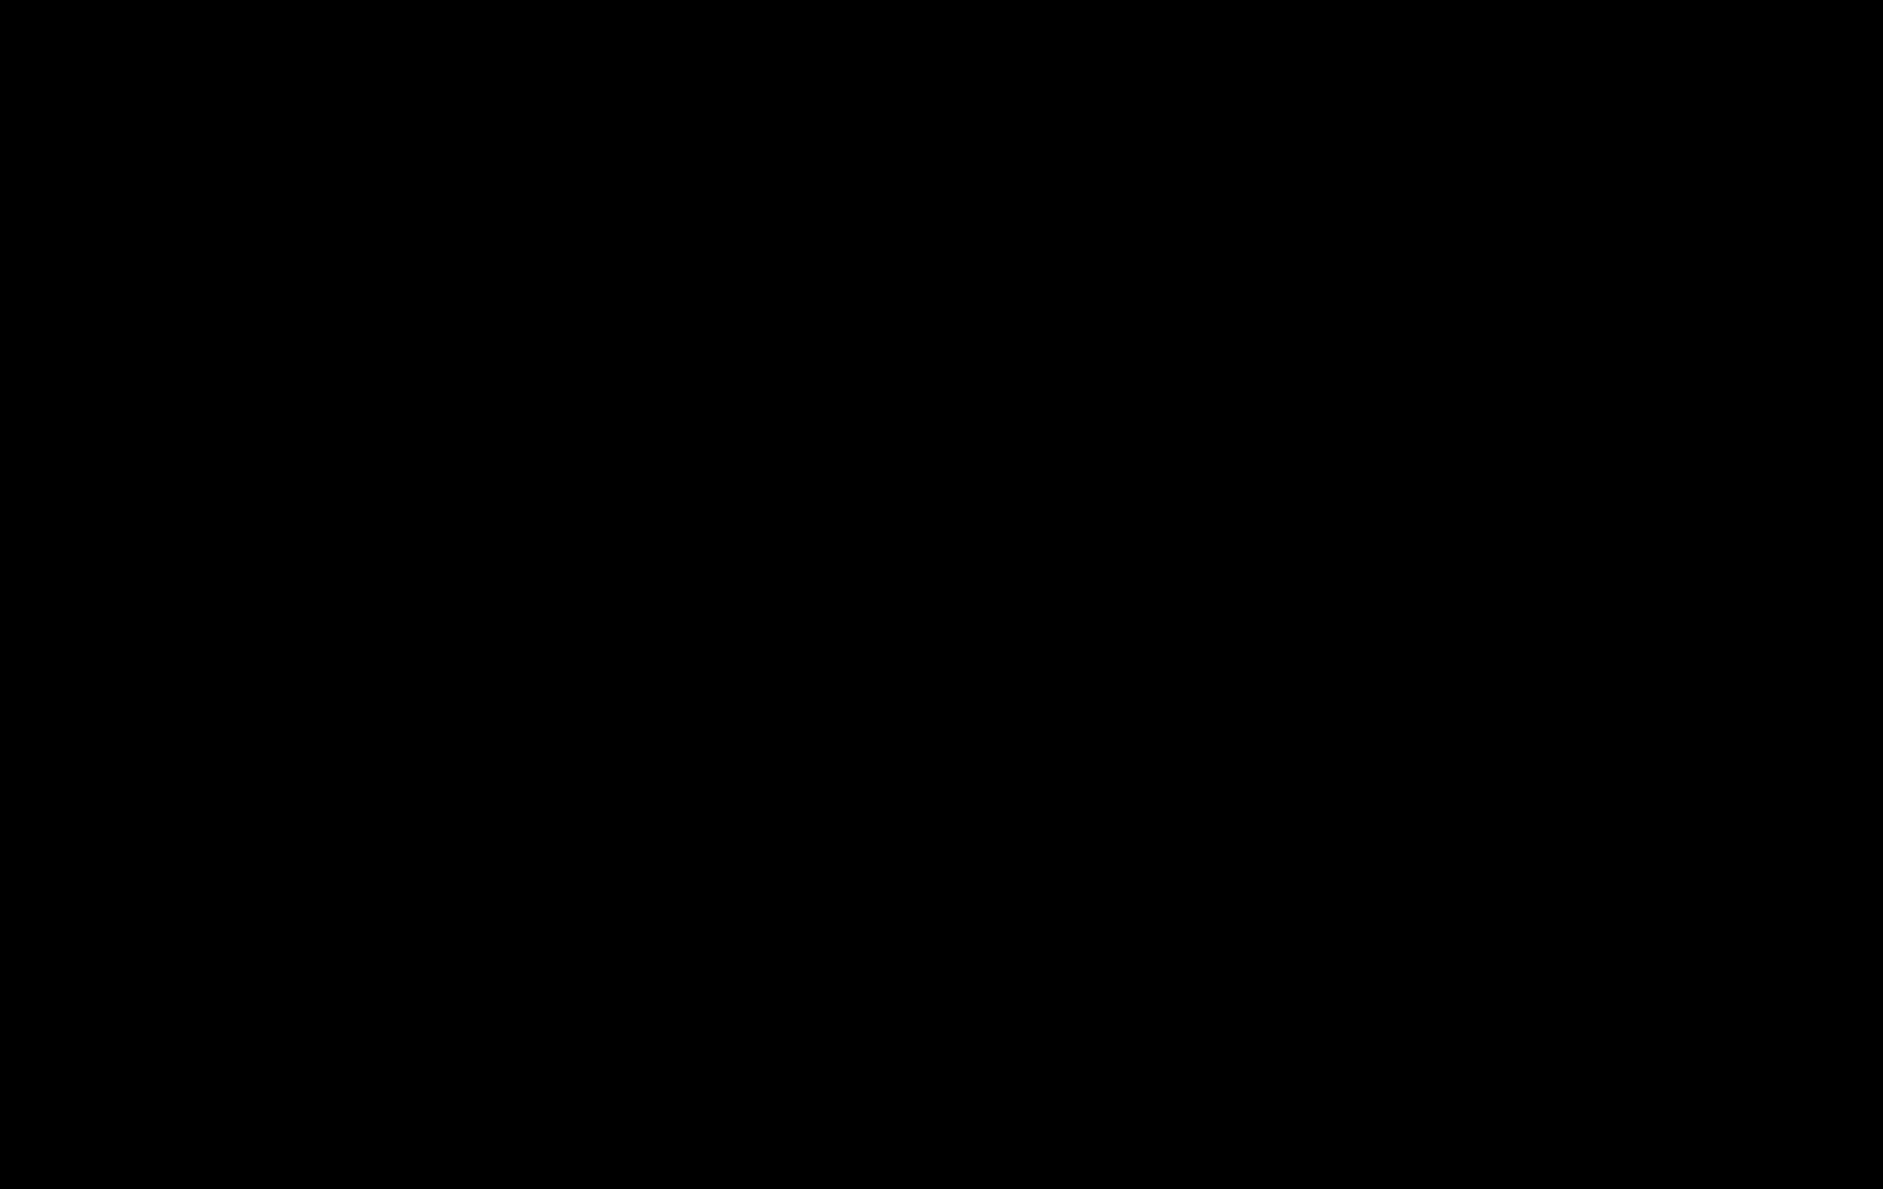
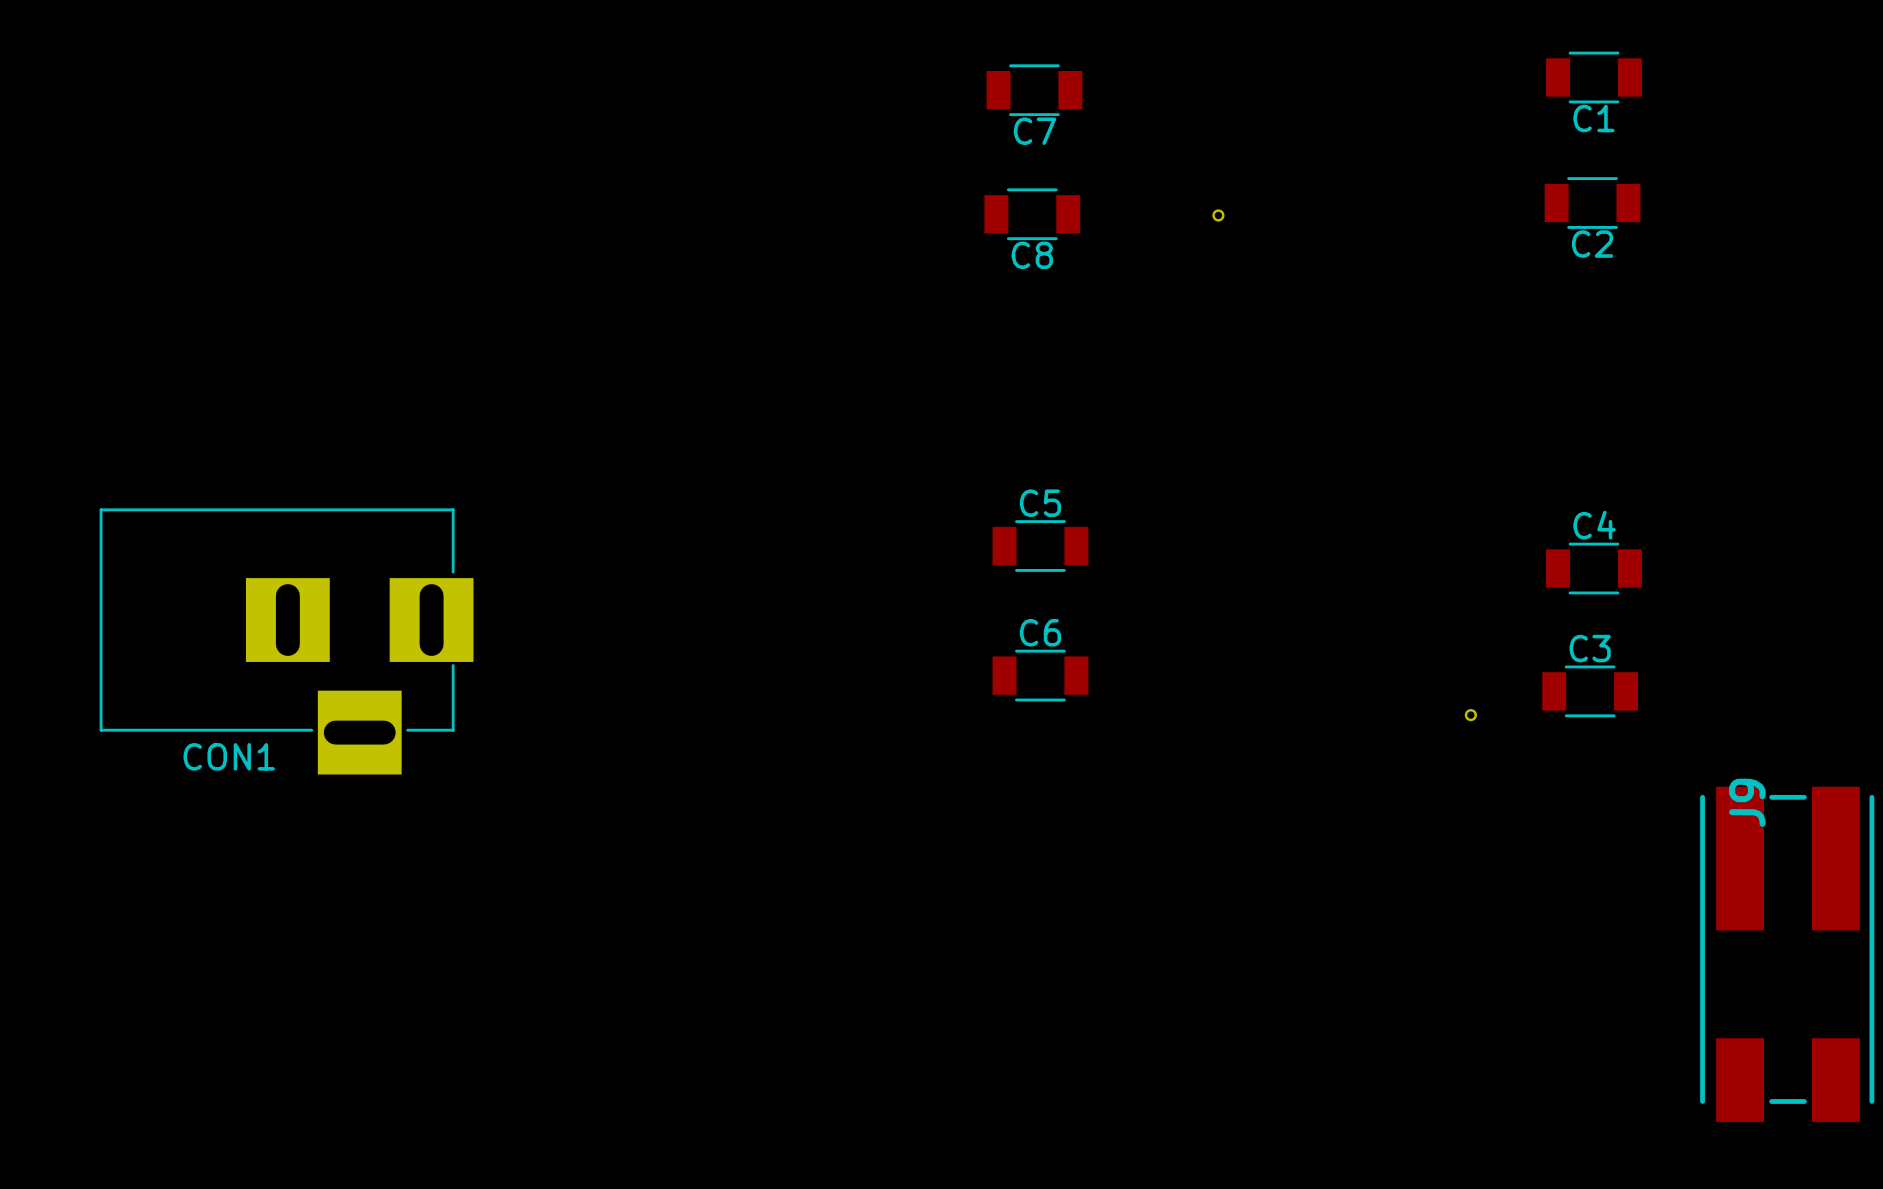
C1: none -> (1593, 77)
C7: none -> (1034, 90)
C2: none -> (1592, 203)
C8: none -> (1032, 214)
part: none -> (1218, 215)
C5: none -> (1040, 546)
C4: none -> (1593, 568)
CON1: none -> (286, 641)
C6: none -> (1040, 675)
C3: none -> (1590, 691)
part: none -> (1470, 715)
J9: none -> (1787, 954)

